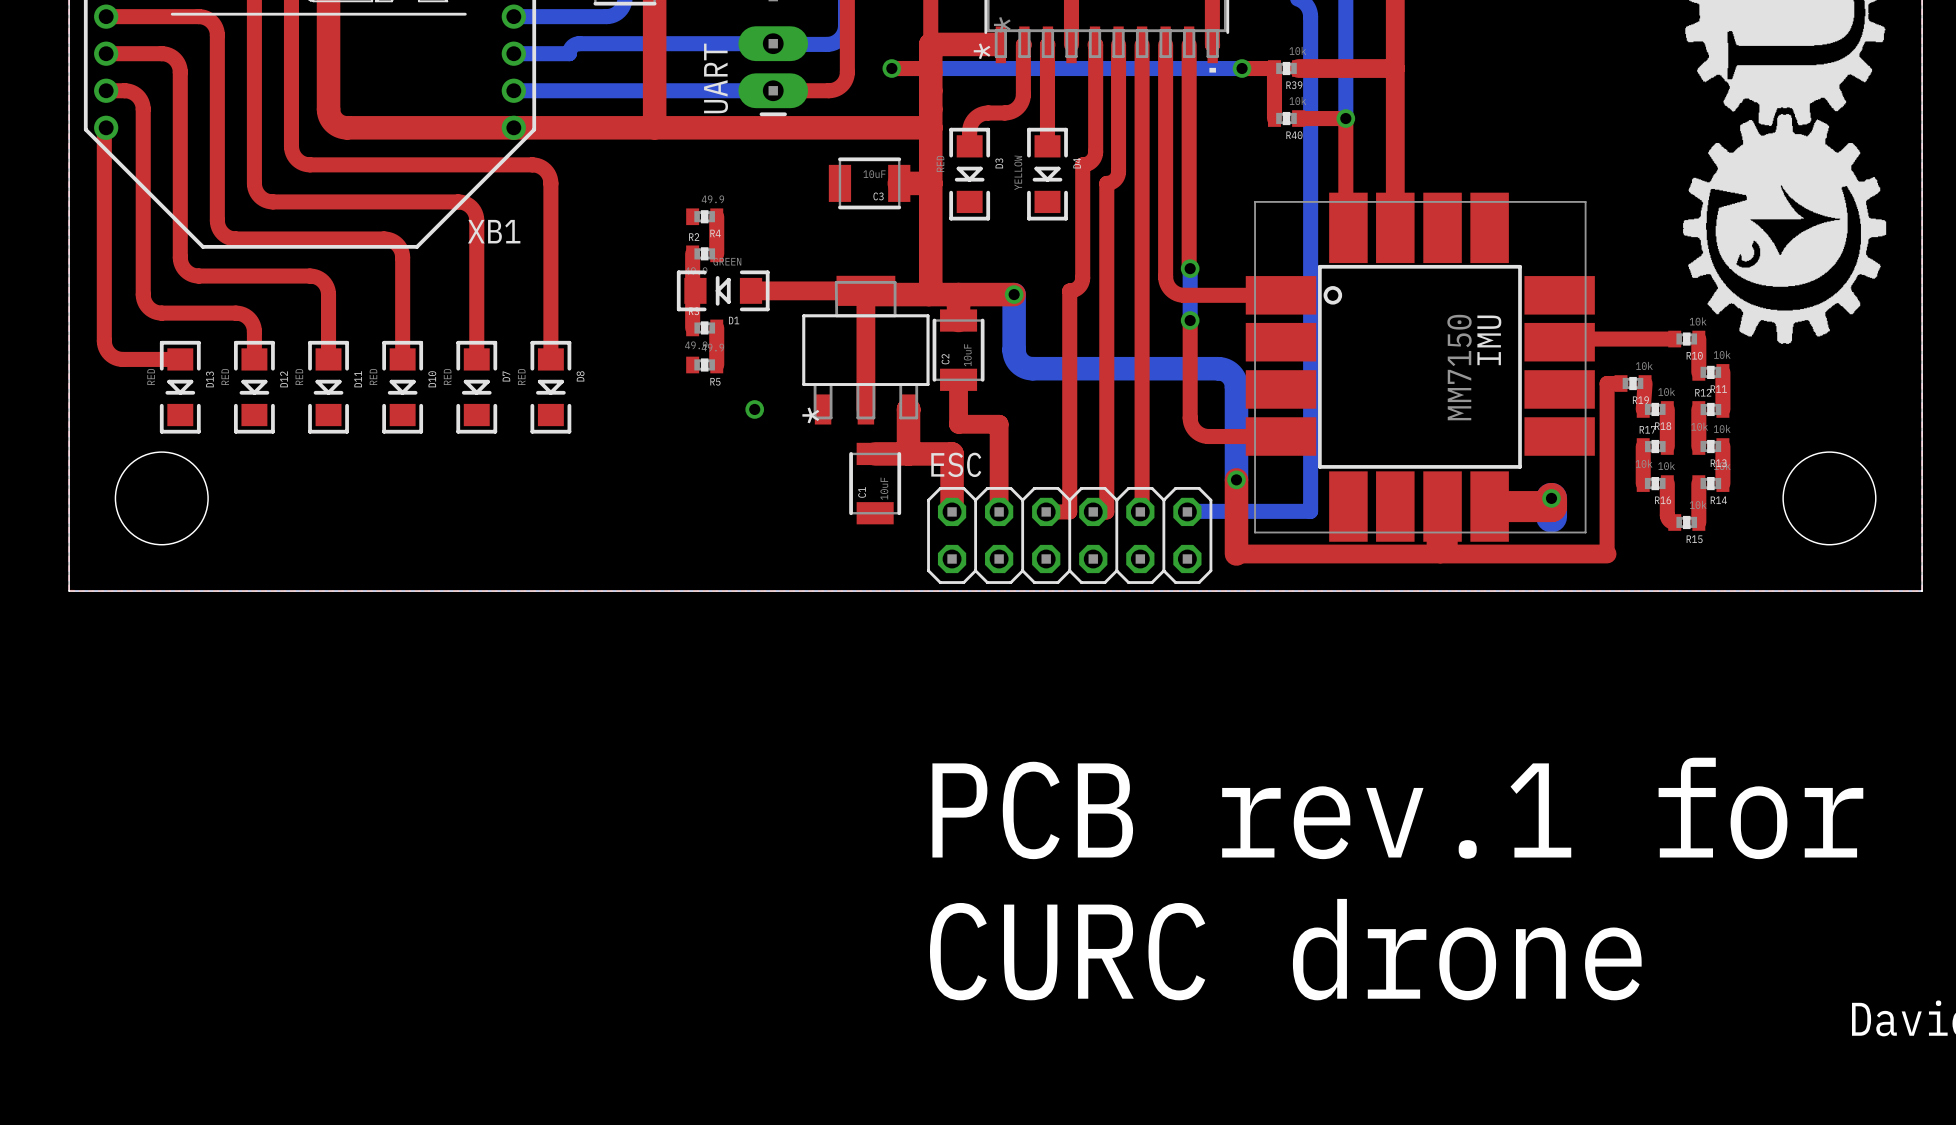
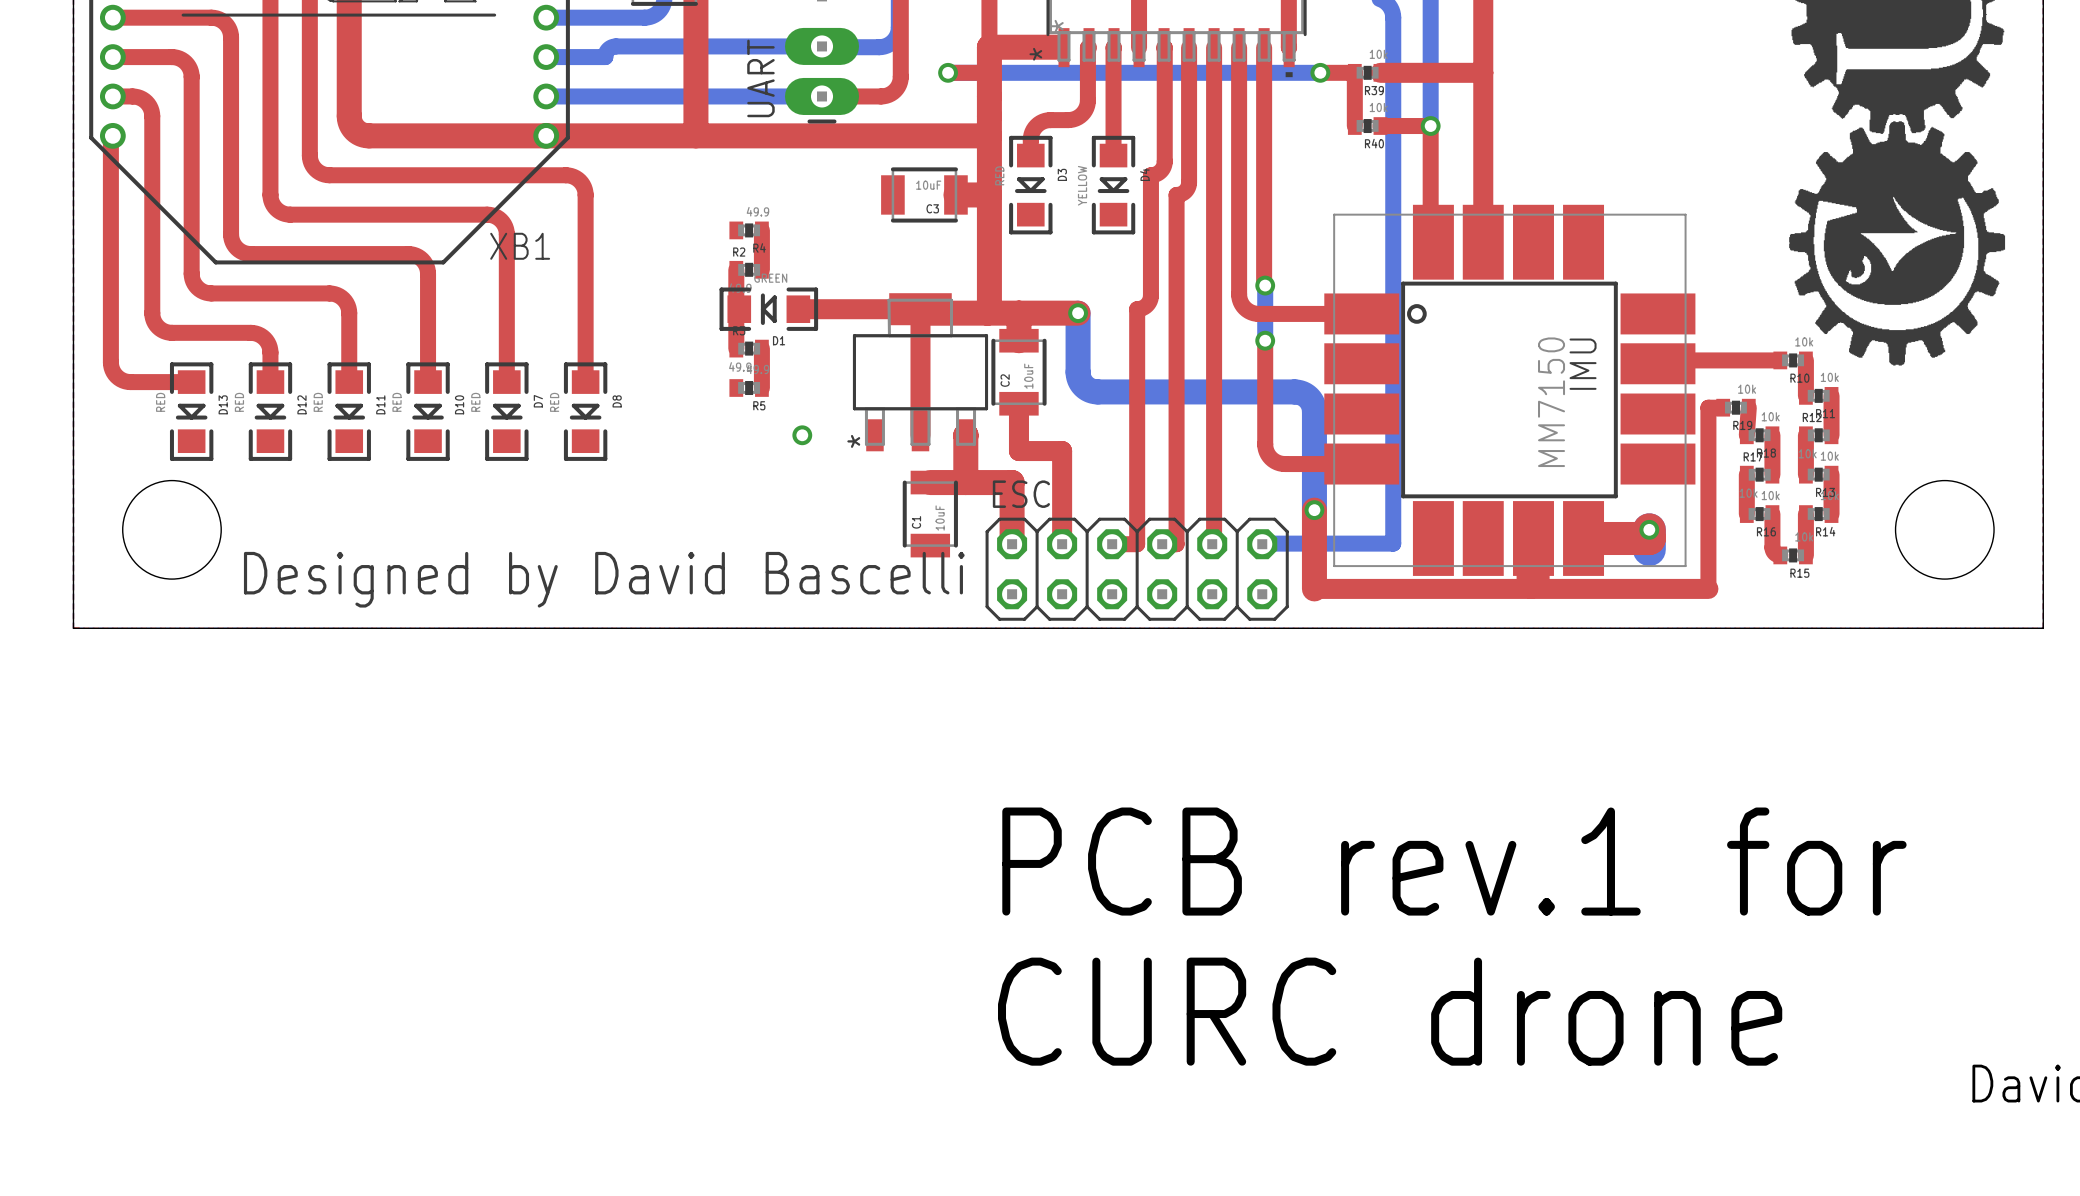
text: none -> Designed by David Bascelli (604, 579)

